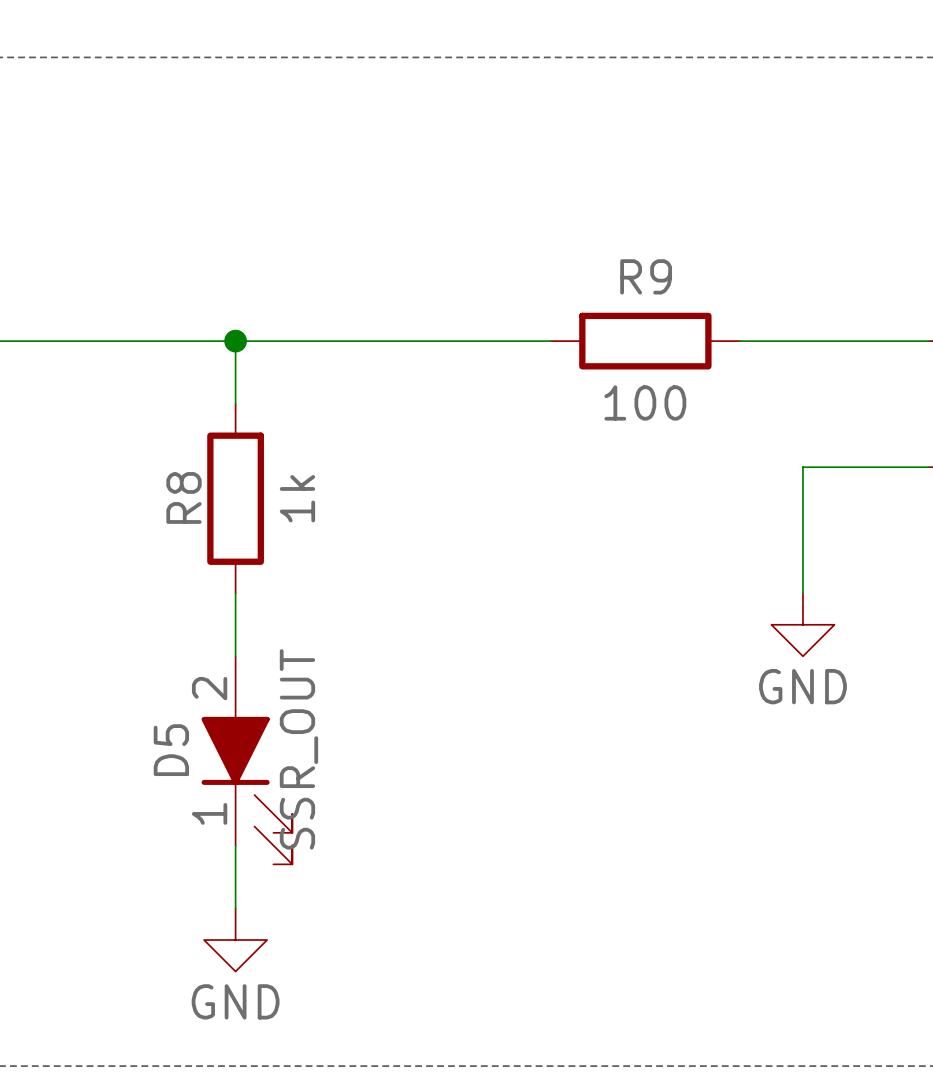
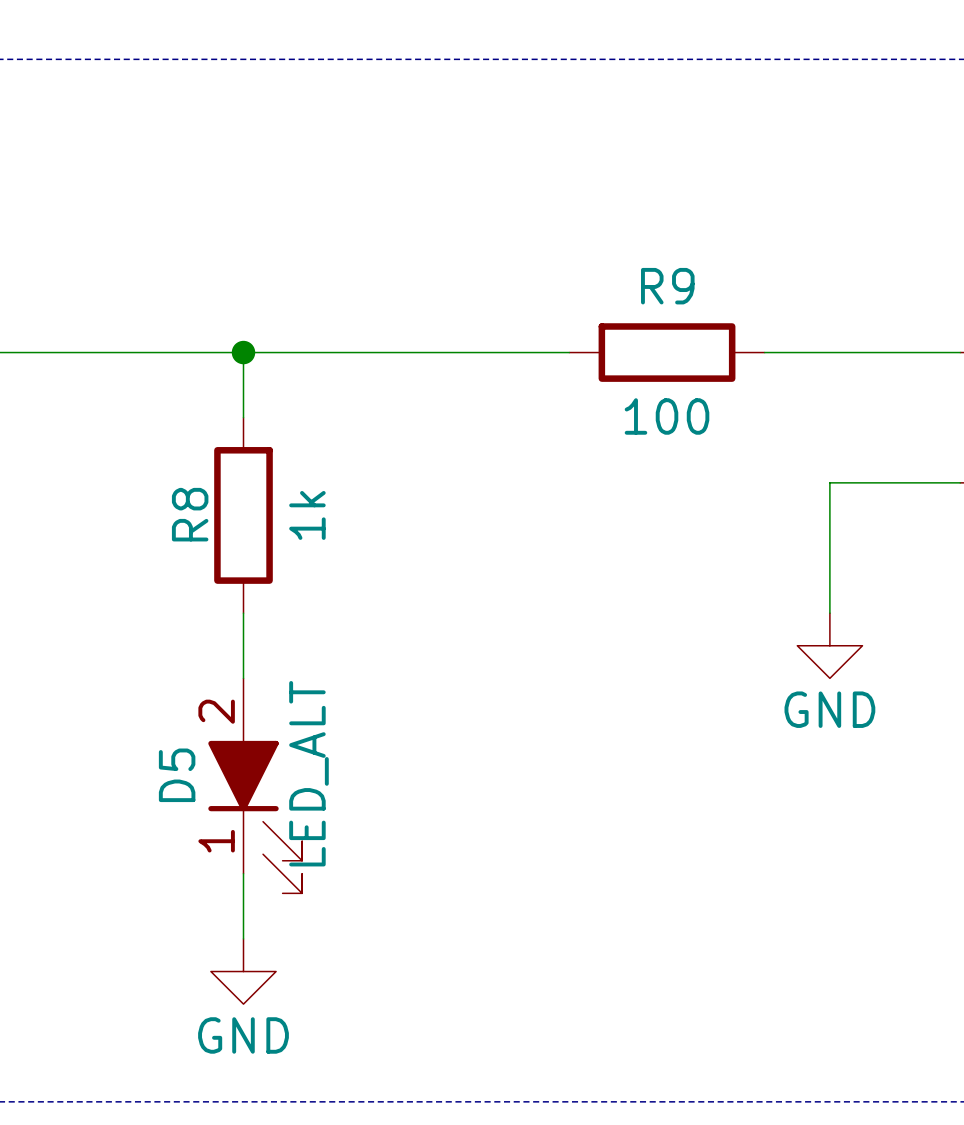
D5 value: SSR_OUT (298, 749) -> LED_ALT (308, 773)

